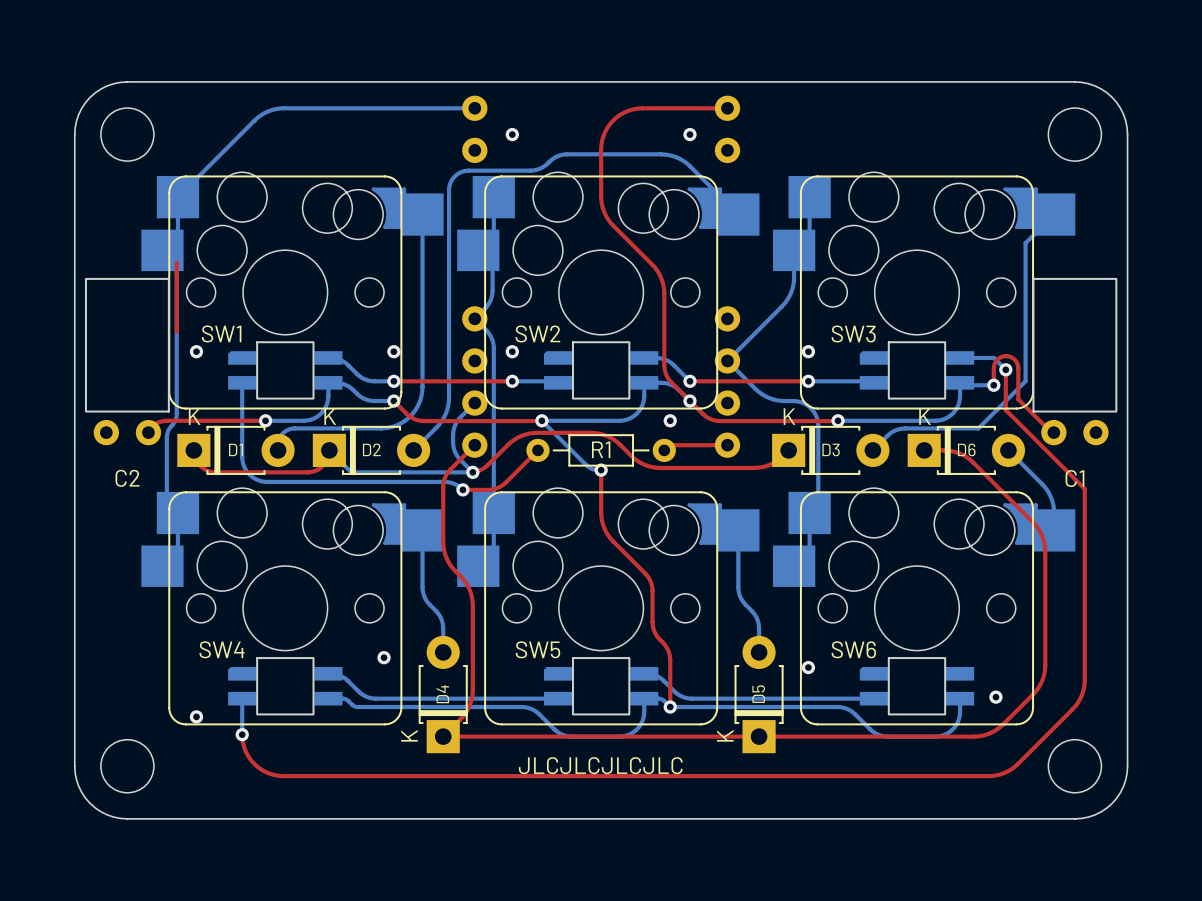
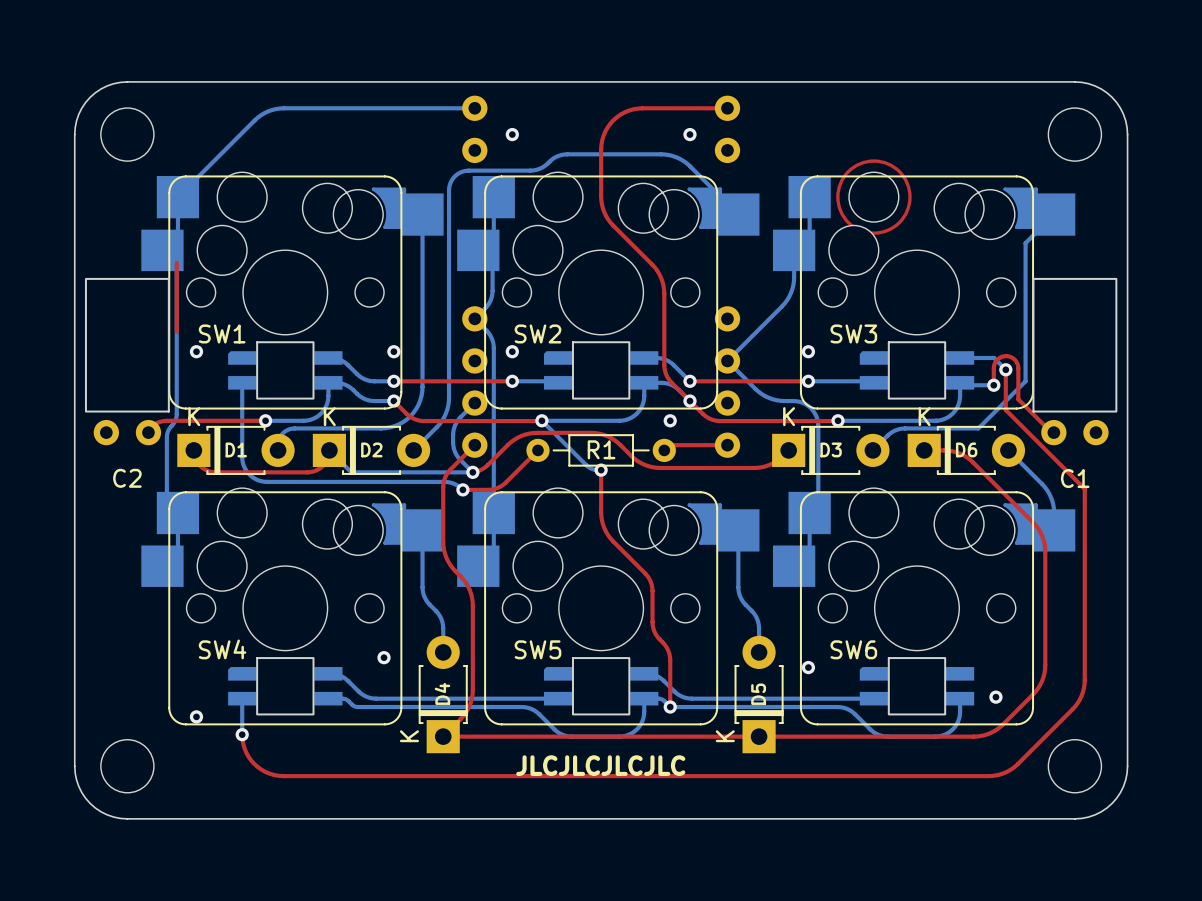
drawing: none -> [836, 159, 912, 235]

